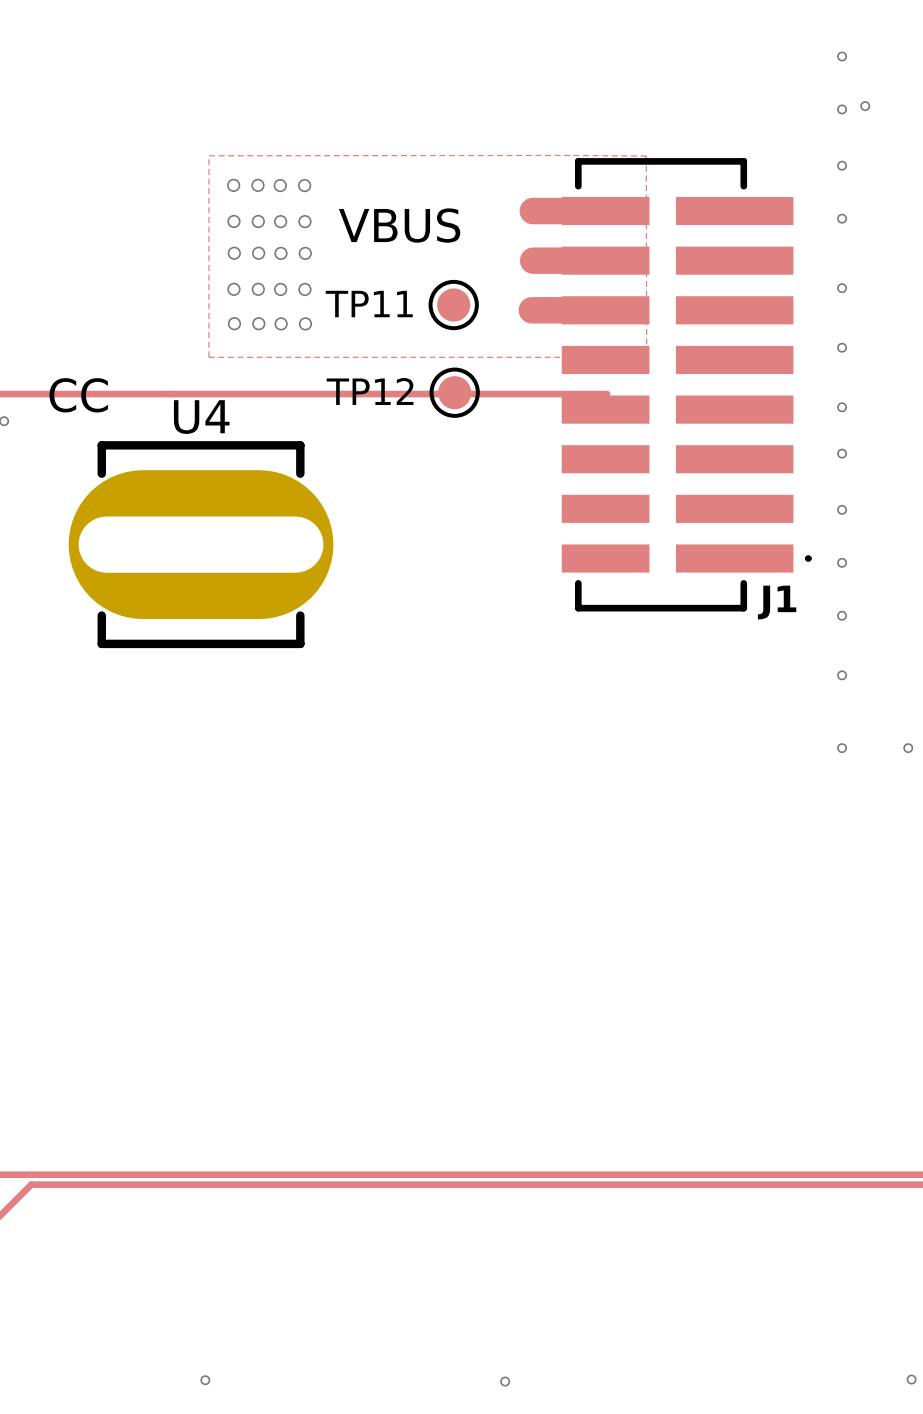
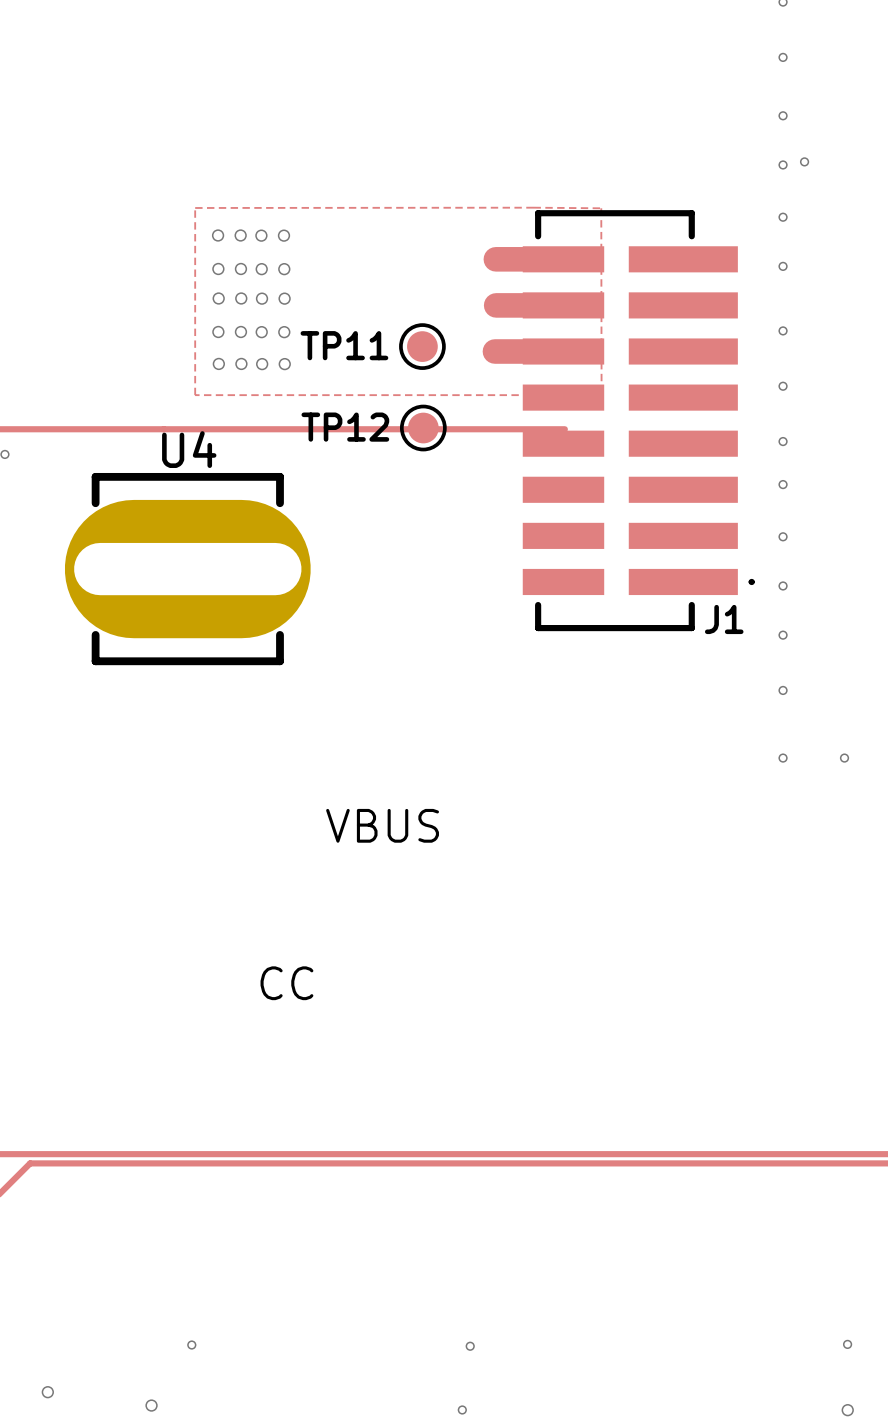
text position: VBUS (399, 225) -> VBUS (382, 825)
text position: CC (78, 395) -> CC (286, 983)

